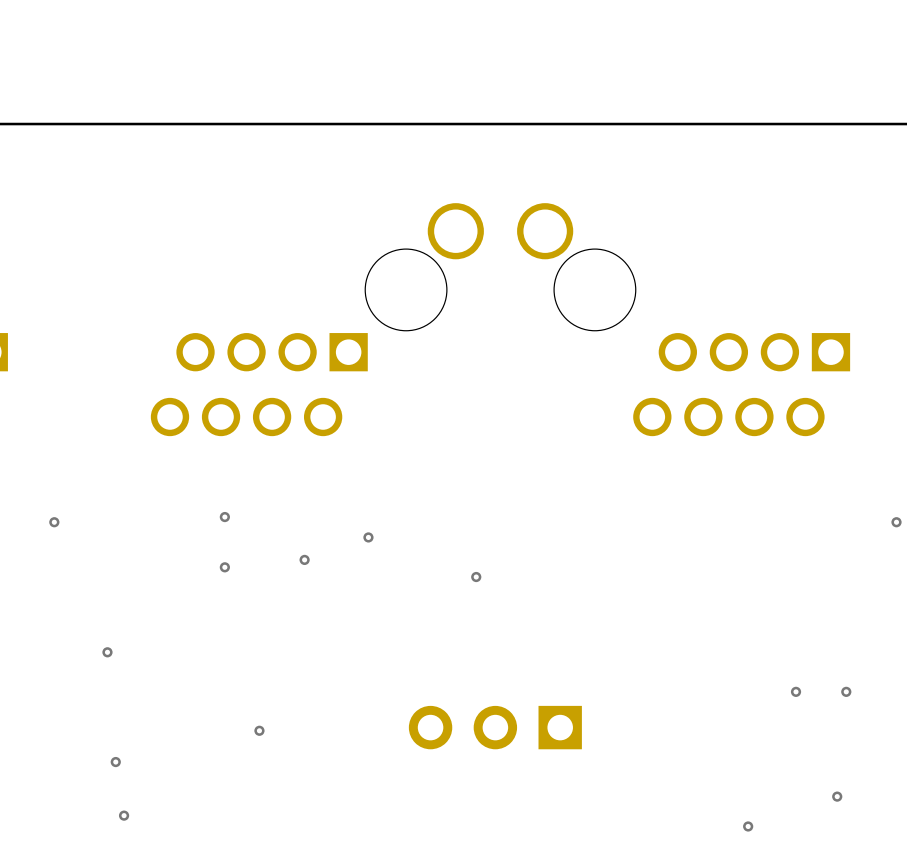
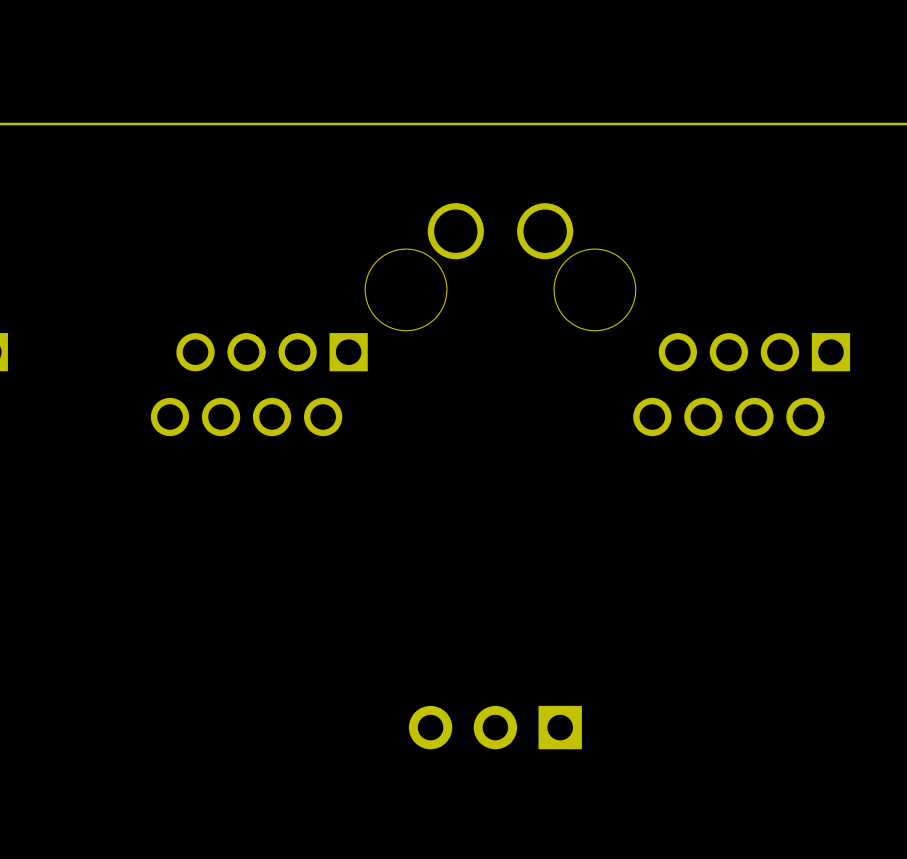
via: (224, 517) -> none
via: (54, 522) -> none
via: (896, 522) -> none
via: (368, 537) -> none
via: (304, 559) -> none
via: (224, 567) -> none
via: (476, 577) -> none
via: (107, 652) -> none
via: (796, 691) -> none
via: (846, 691) -> none
via: (259, 730) -> none
via: (115, 762) -> none
via: (837, 796) -> none
via: (124, 815) -> none
via: (748, 826) -> none

